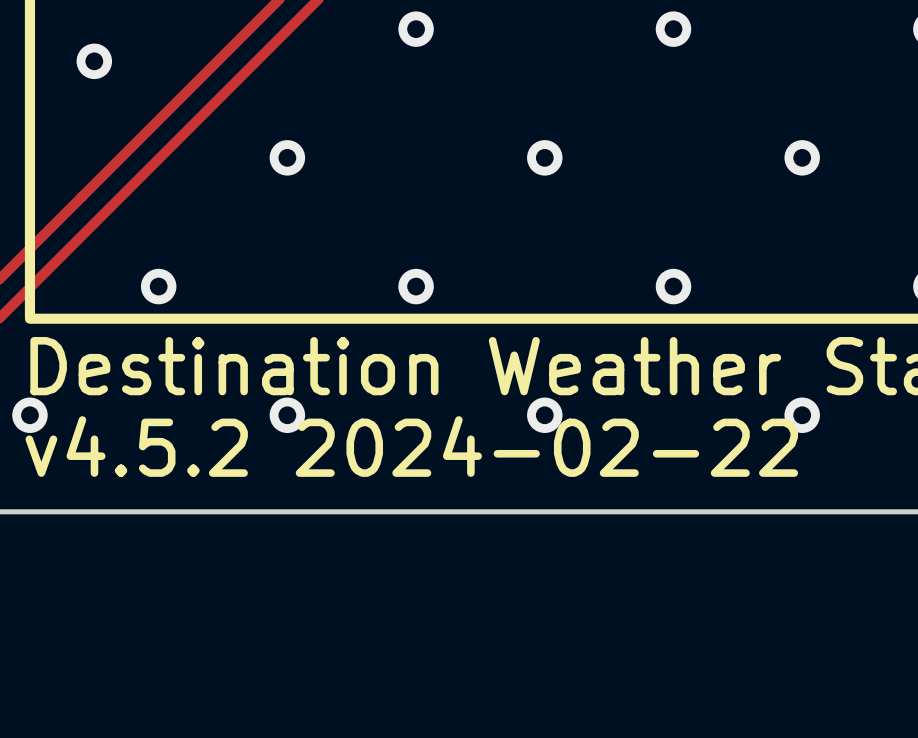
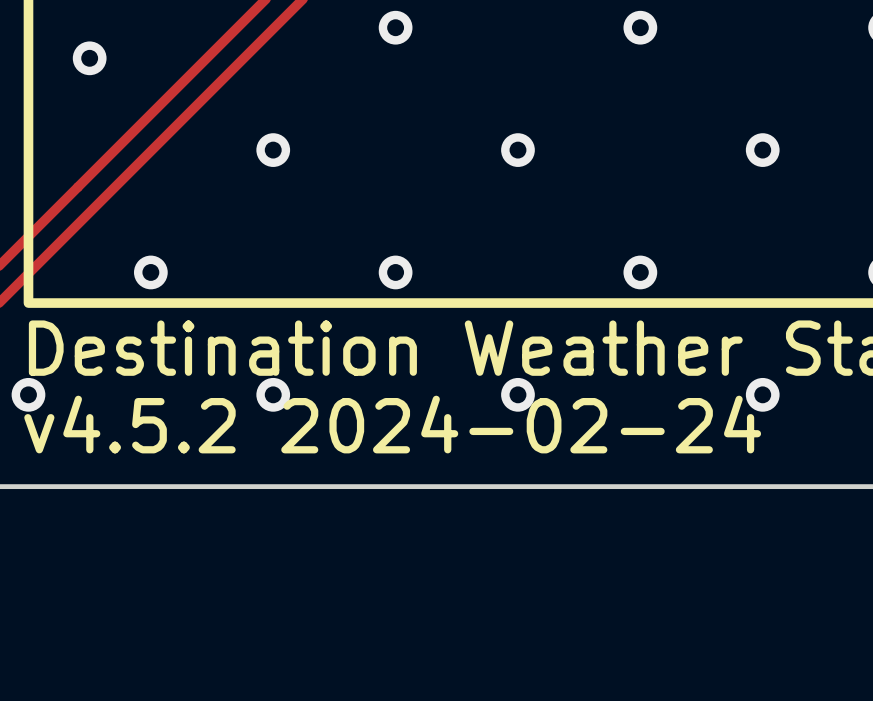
text: v4.5.2 2024-02-22 (411, 446) -> v4.5.2 2024-02-24 (392, 424)

